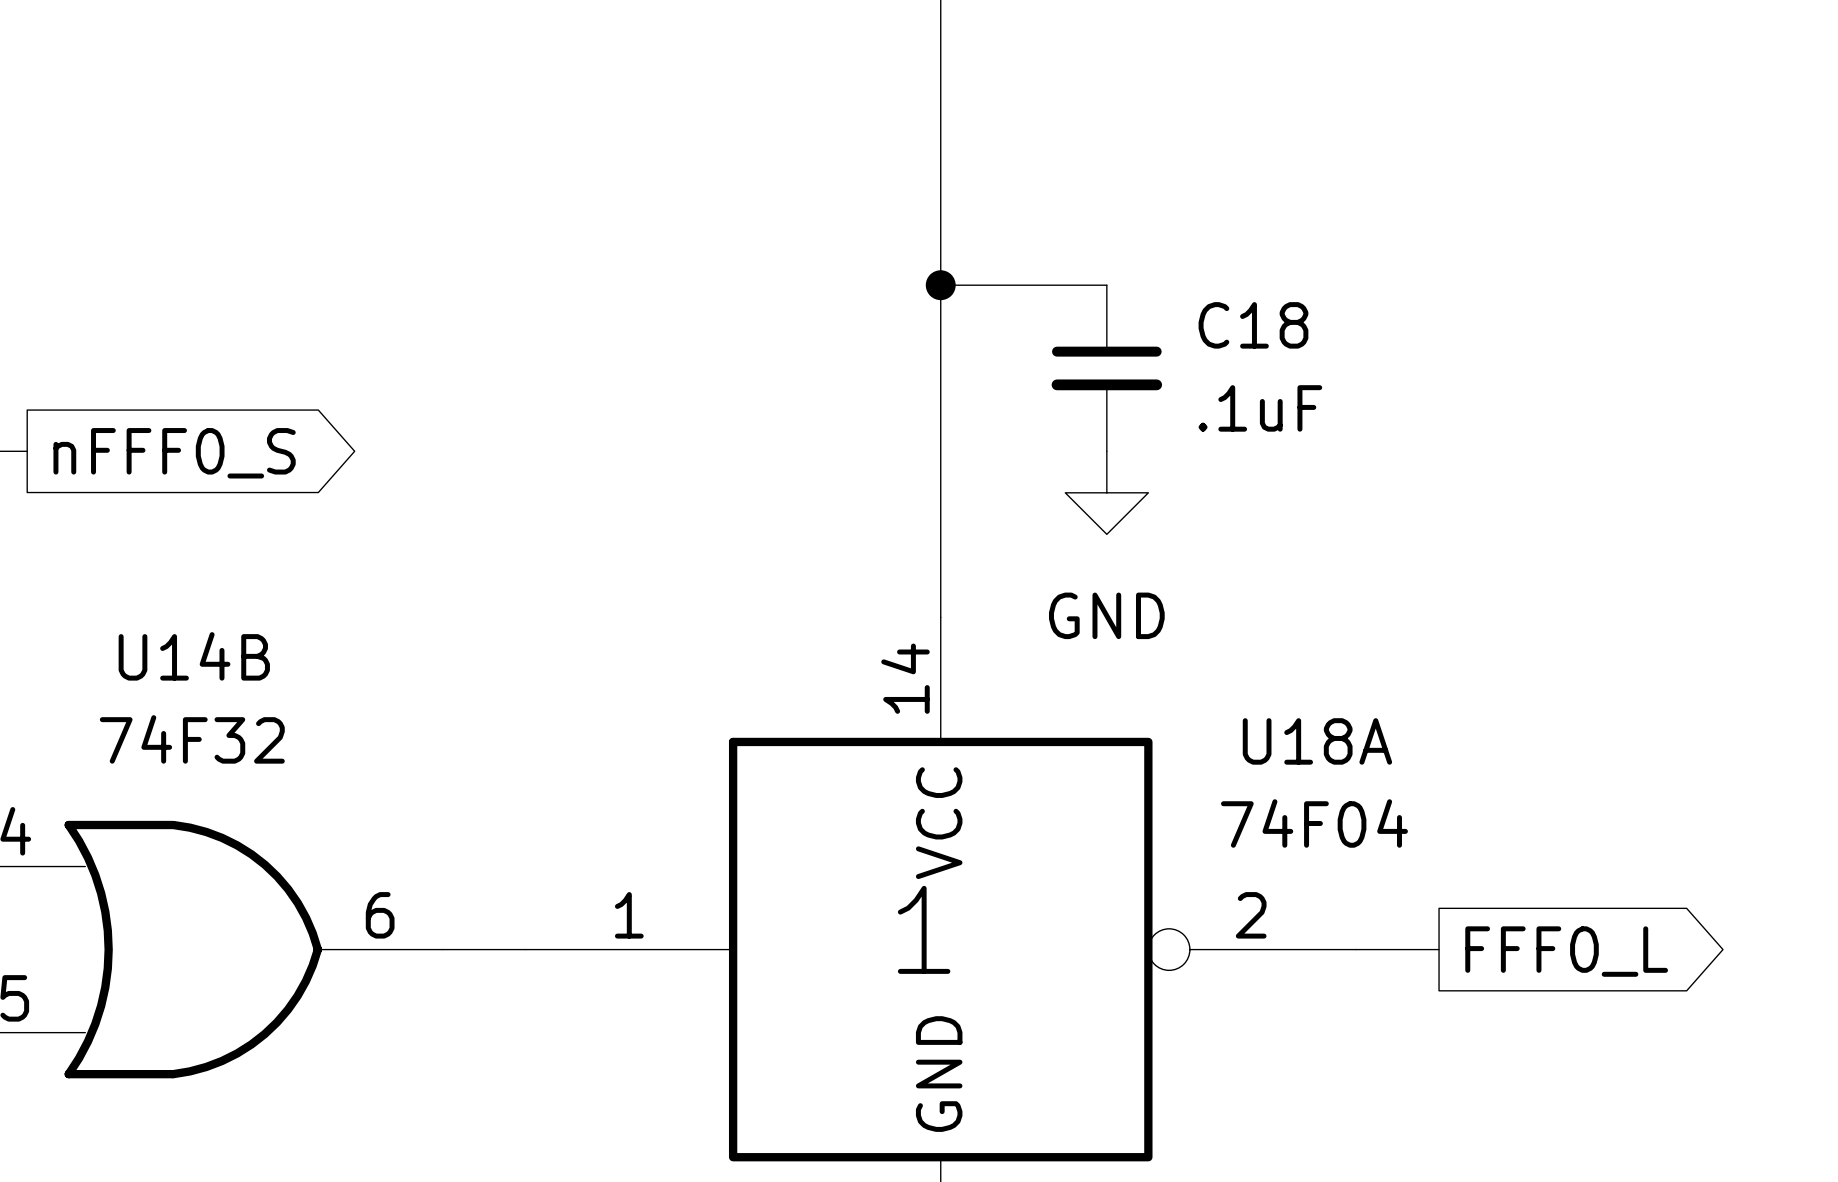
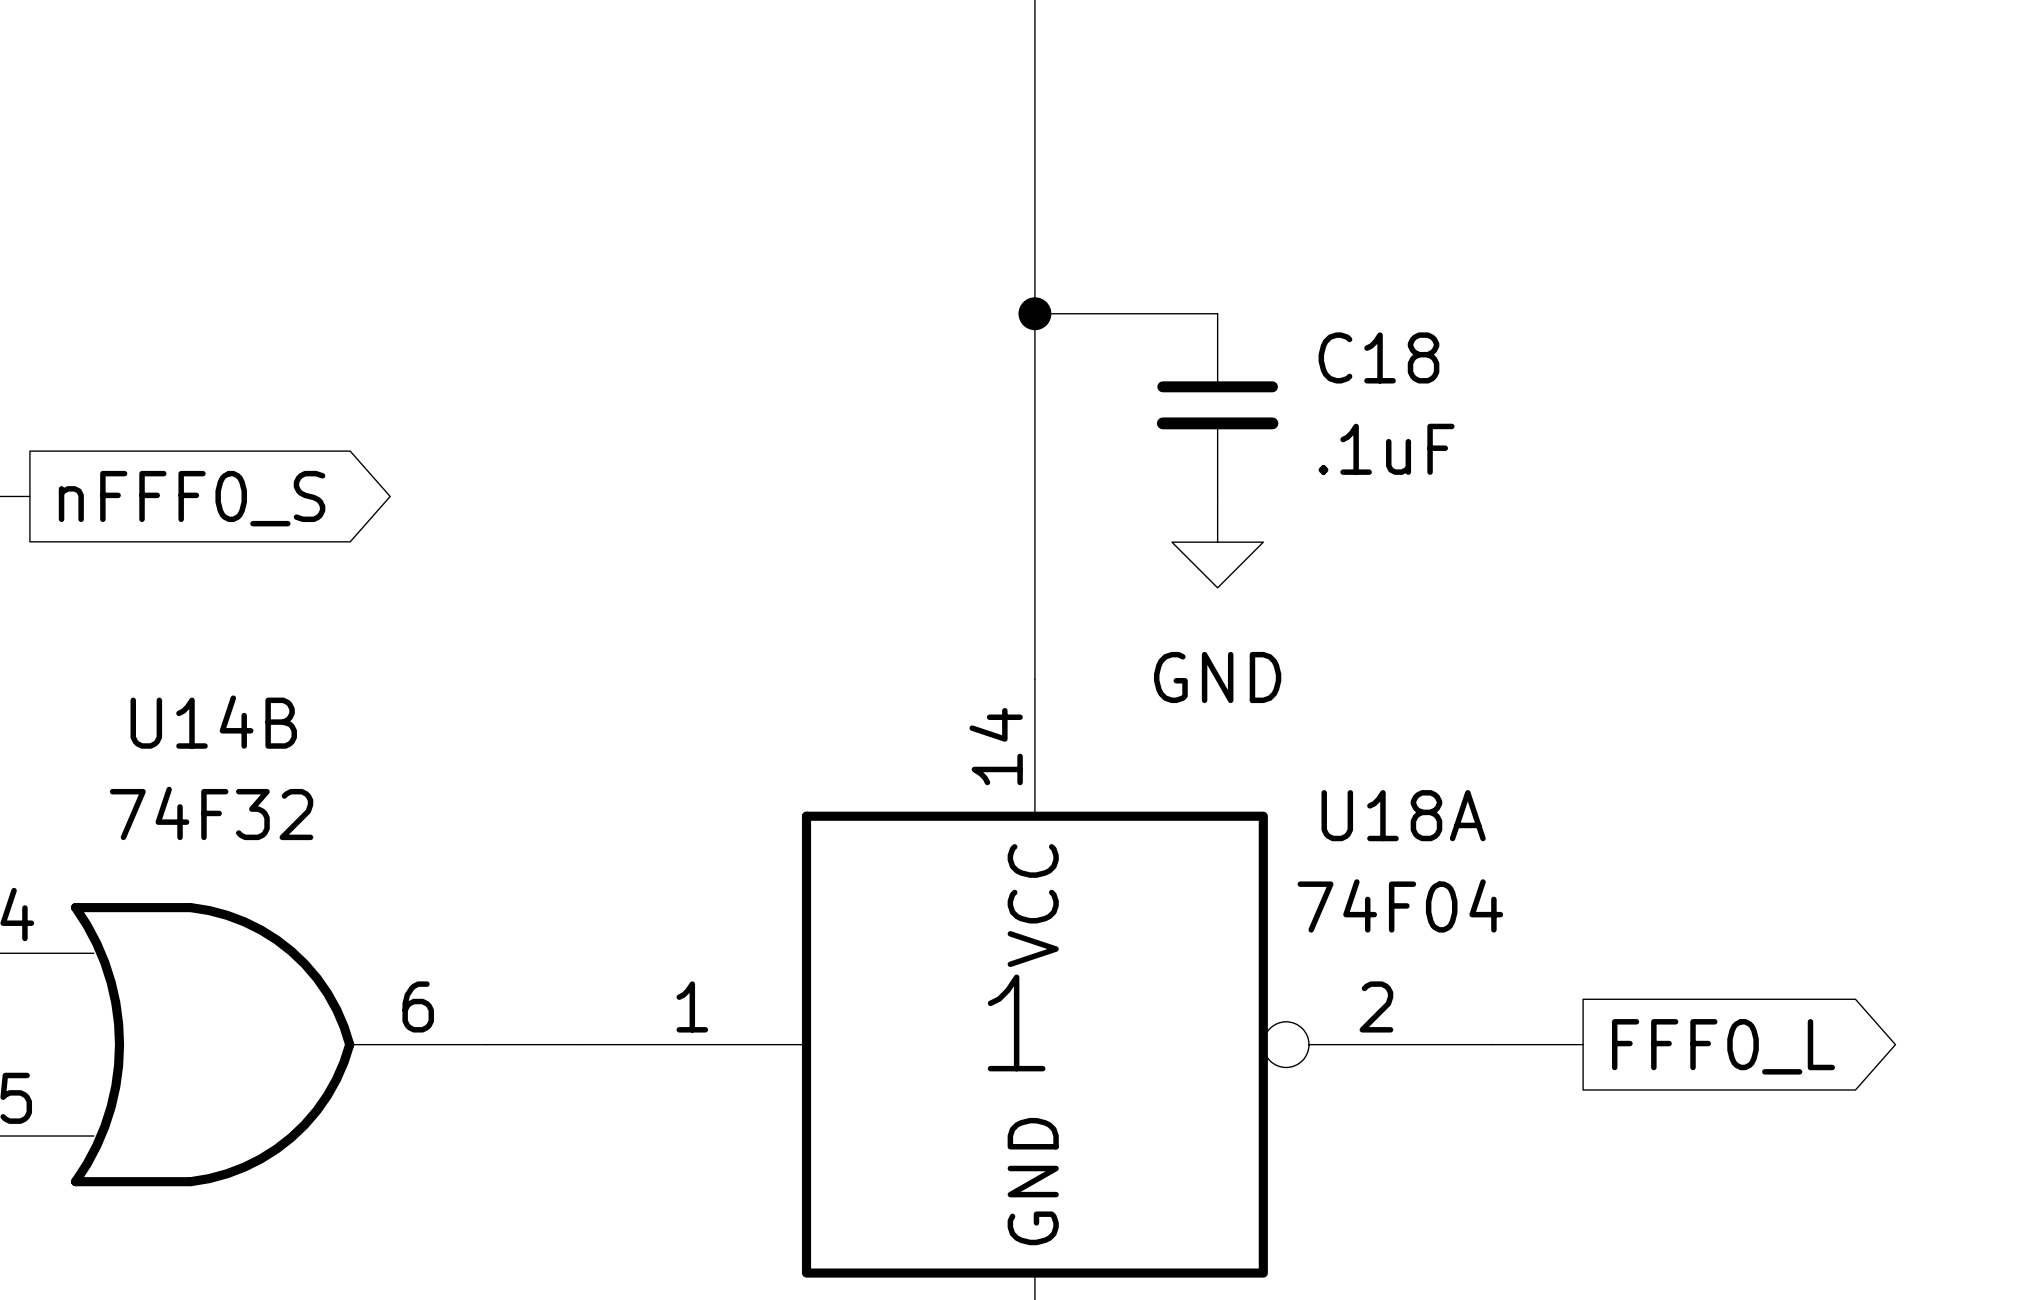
U18A name position: U18A (1317, 741) -> U18A (1403, 815)
U18A value position: 74F04 (1314, 823) -> 74F04 (1400, 905)

